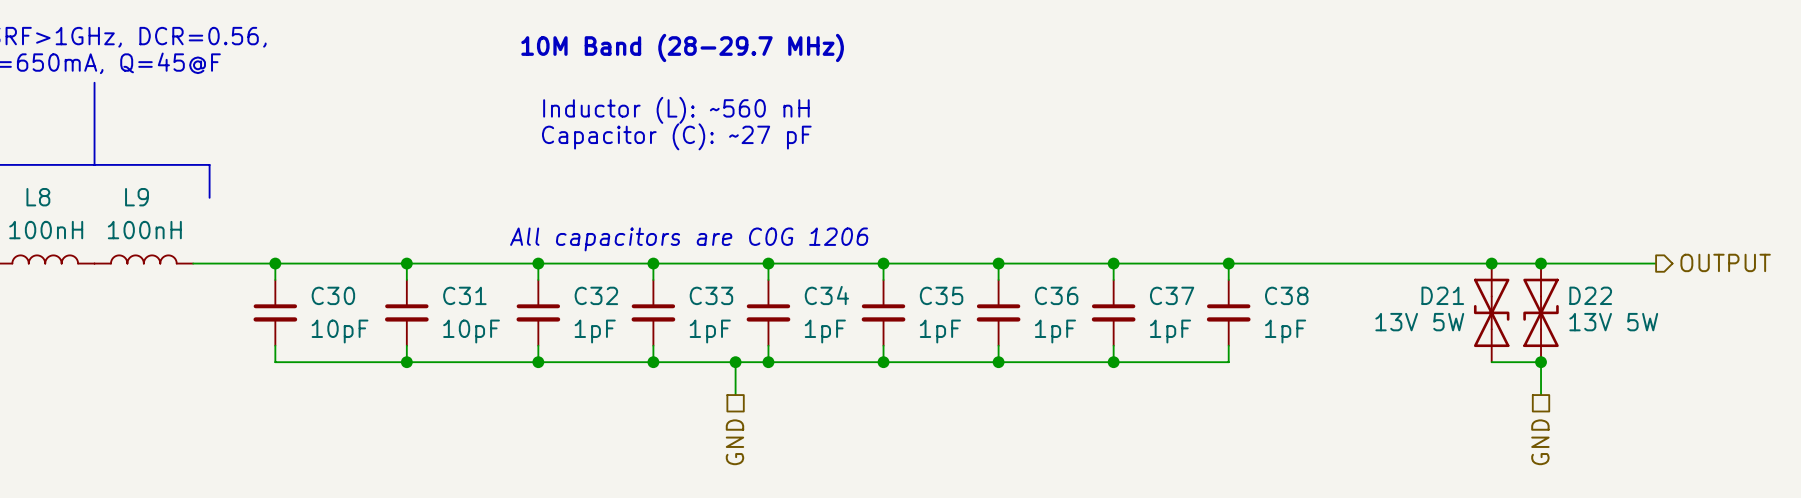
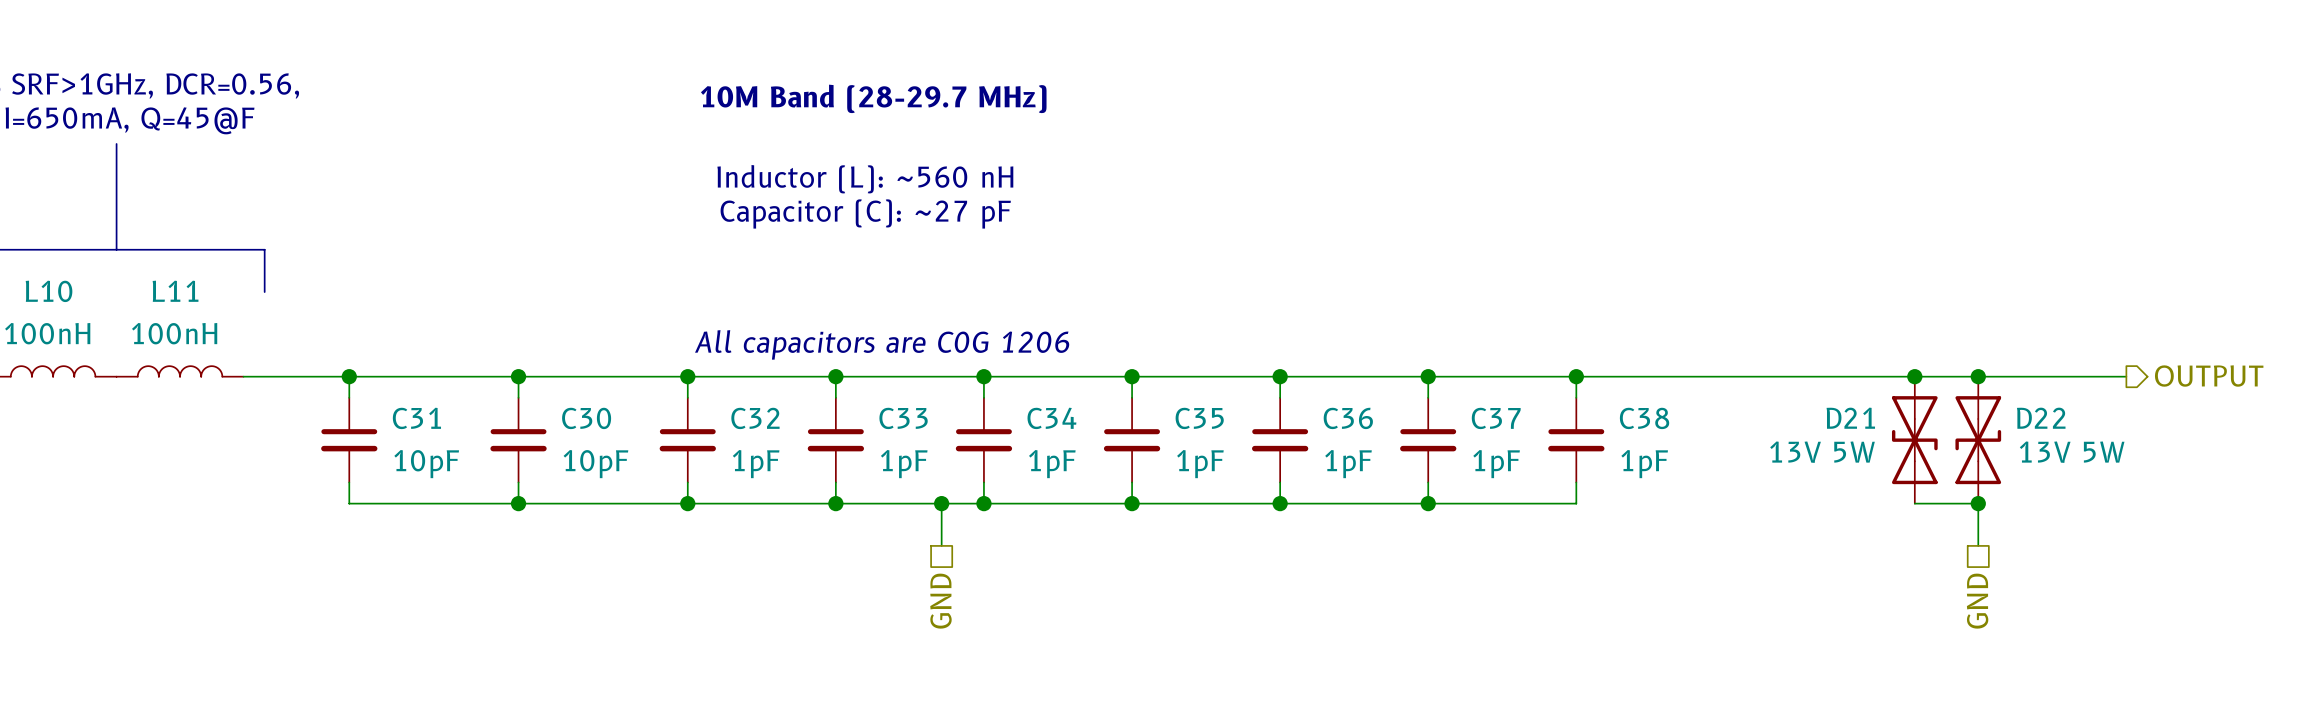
L8 name: L8 (38, 197) -> L10 (49, 291)
L9 name: L9 (137, 197) -> L11 (175, 291)
C30 name: C30 (333, 295) -> C31 (416, 418)
C31 name: C31 (464, 295) -> C30 (586, 418)

